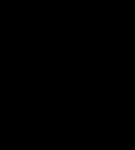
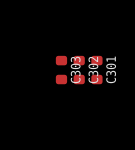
C303: none -> (61, 70)
C302: none -> (79, 70)
C301: none -> (96, 70)

